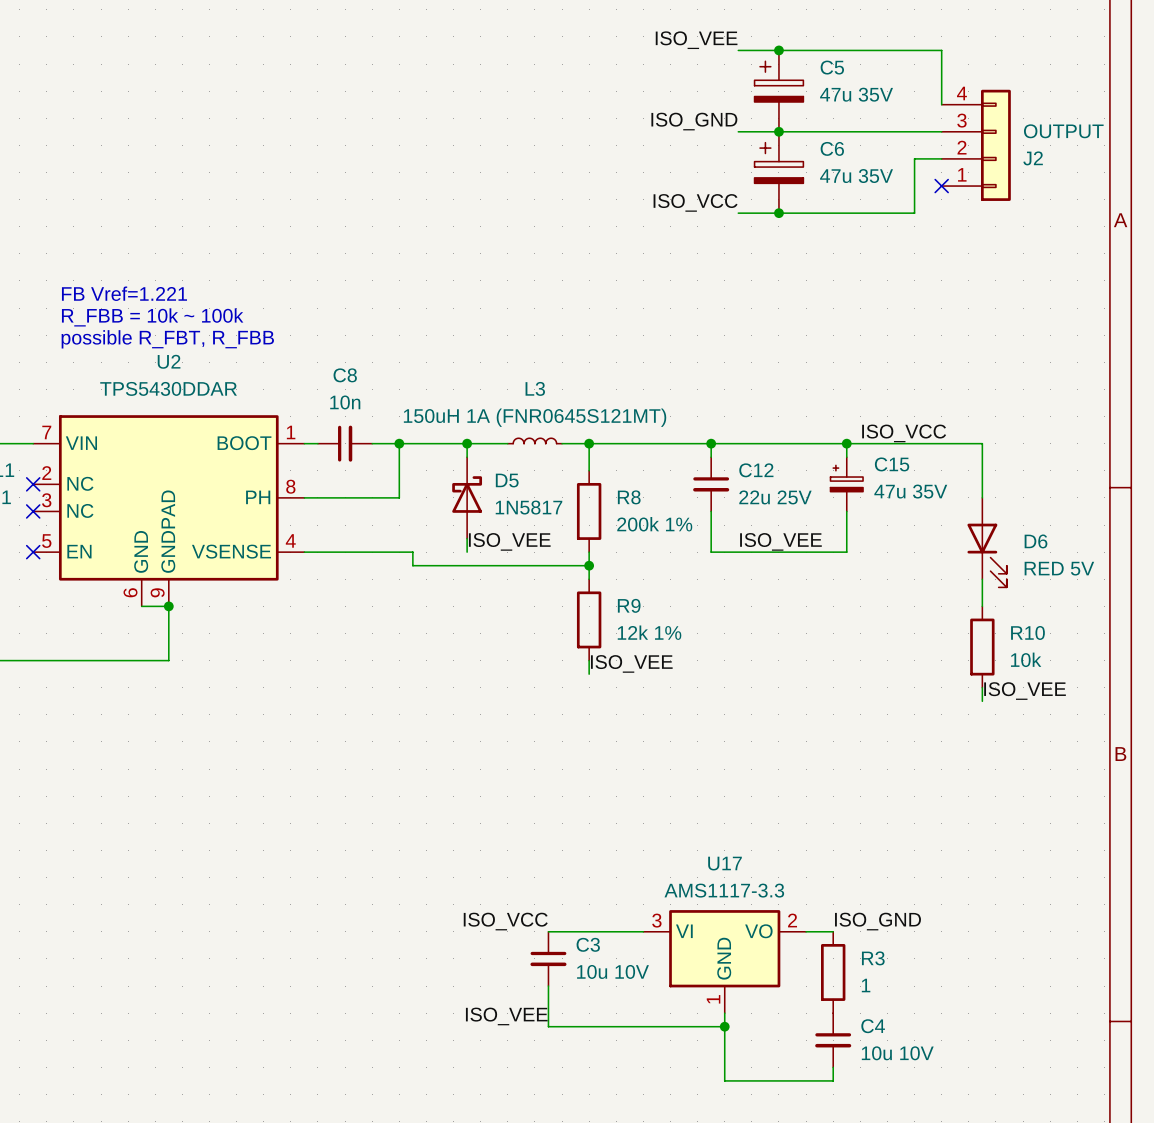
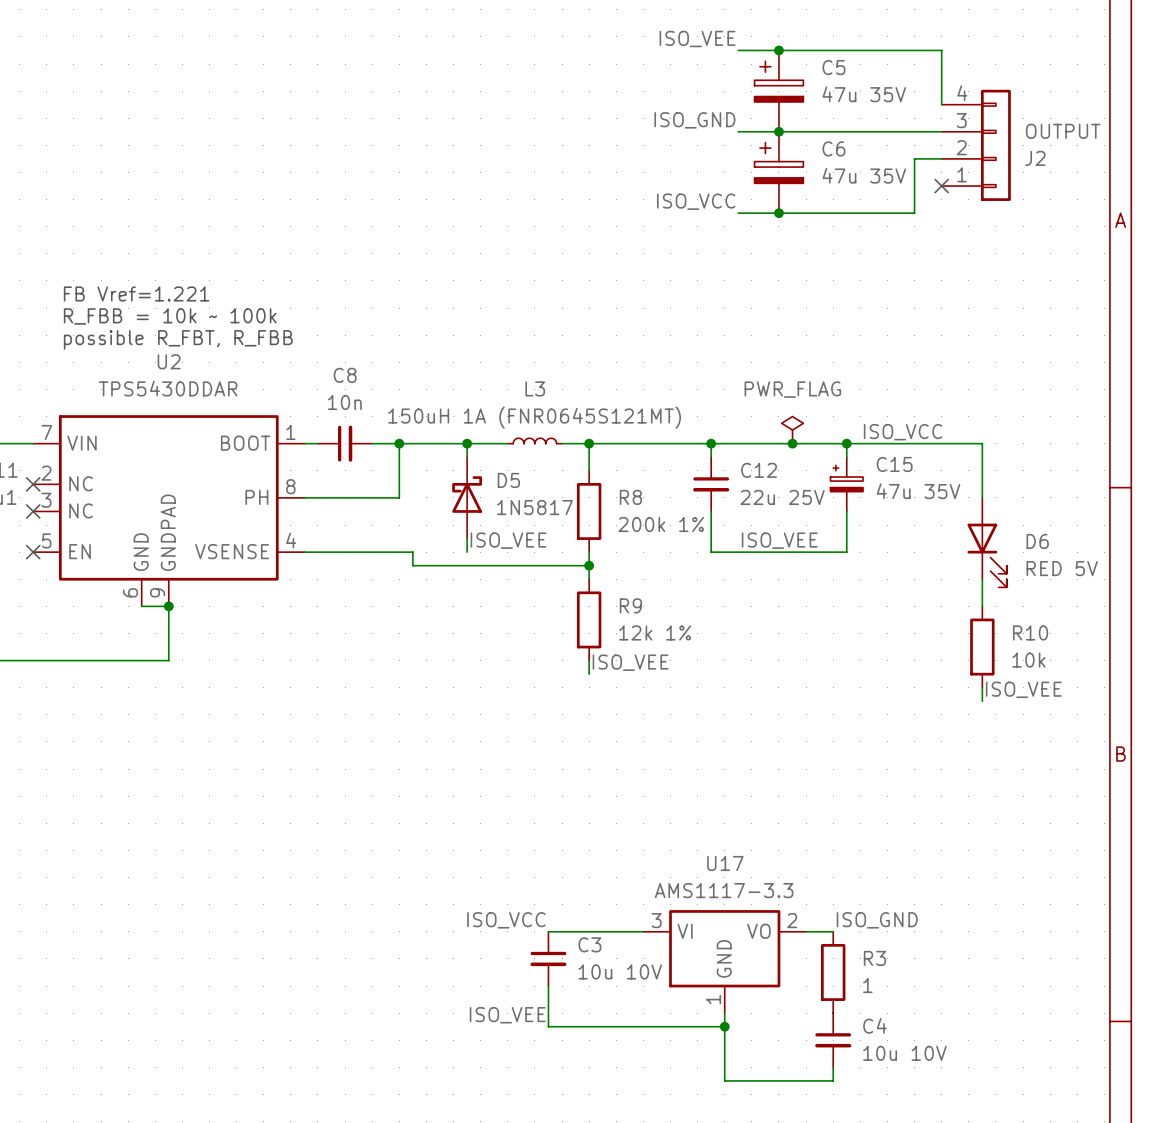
power symbol: none -> PWR_FLAG (792, 430)
junction: none -> (792, 443)

